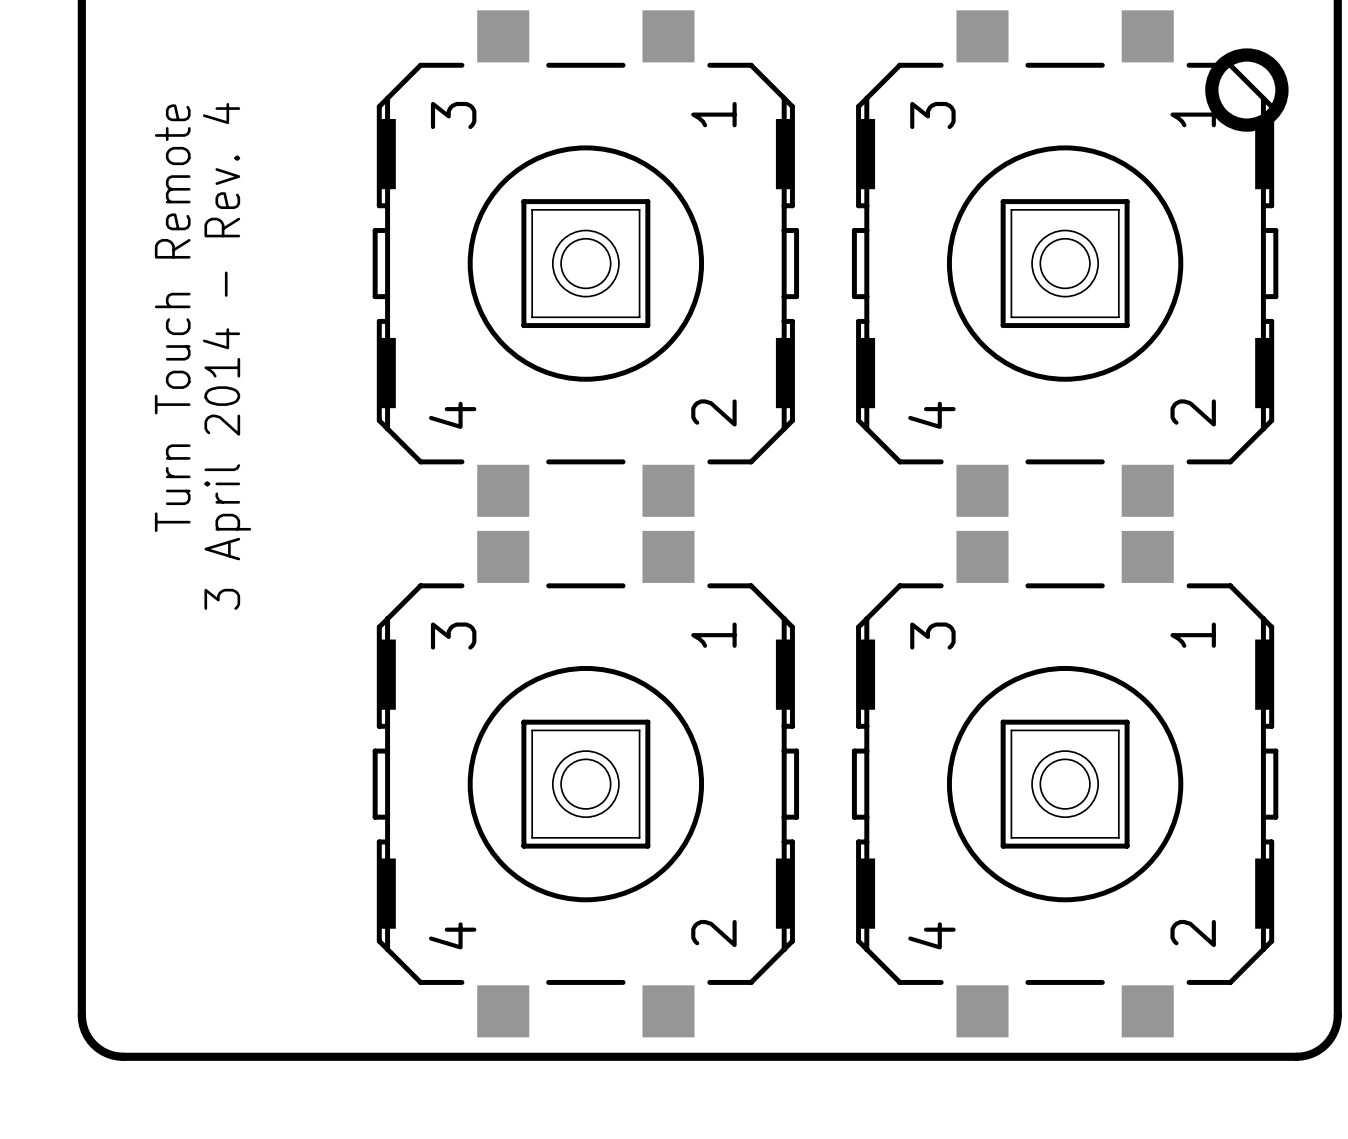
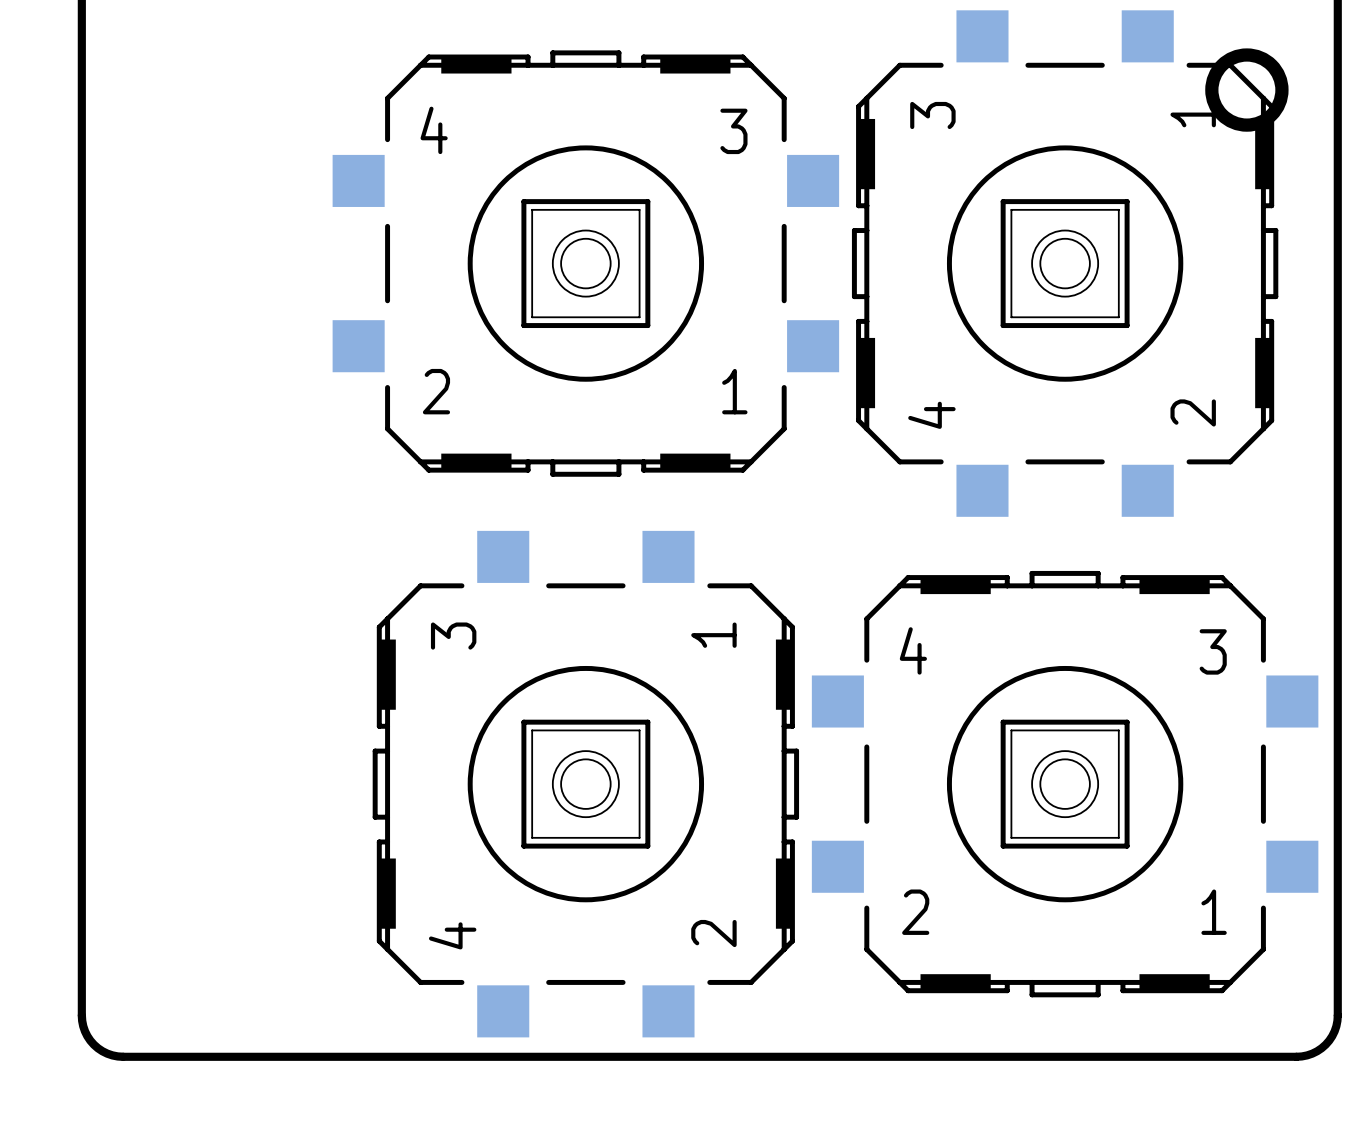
part rotation: 0° (585, 263) -> 90° clockwise (585, 263)
text: Turn Touch Remote (172, 318) -> none
text: 3 April 2014 - Rev. 4 (227, 356) -> none
part rotation: 0° (1065, 784) -> 90° clockwise (1065, 784)

